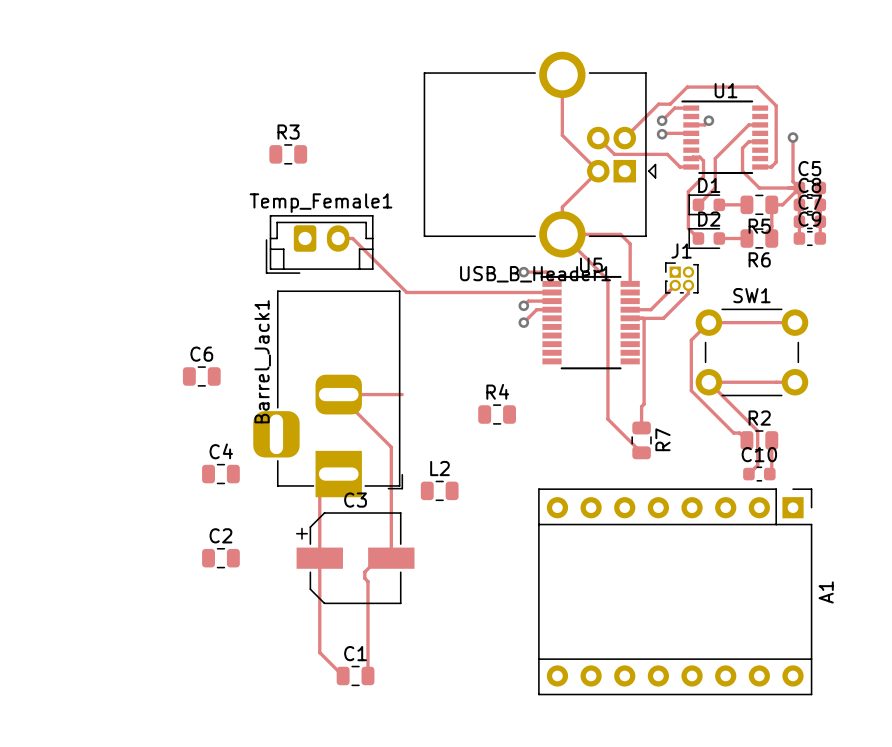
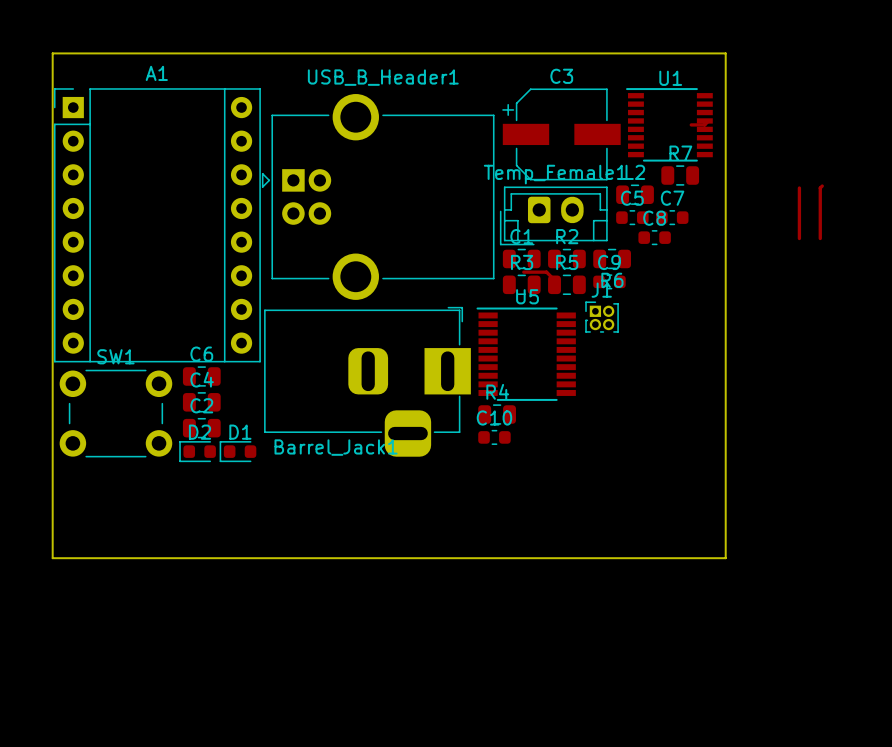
board edge: none -> (52, 53) (725, 53) (725, 558) (52, 558) (52, 53)
track: (562, 74) (562, 135) (598, 171) (562, 207) (562, 234) -> none
track: (691, 108) (674, 108) (662, 120) -> none
via: (662, 120) -> none
via: (708, 120) -> none
track: (760, 124) (748, 124) (715, 158) (715, 188) (698, 204) -> none
track: (691, 133) (662, 134) -> none
via: (662, 134) -> none
U1 position: (724, 137) -> (669, 124)
track: (793, 137) (793, 181) (799, 188) -> none
via: (793, 137) -> none
track: (598, 138) (614, 154) (667, 154) (680, 166) (691, 166) -> none
track: (624, 138) (658, 104) (670, 104) (687, 87) (757, 87) (776, 105) (776, 162) (771, 166) (760, 166) -> none
track: (760, 141) (748, 141) (742, 148) (742, 171) (759, 188) (799, 188) -> none
R3 position: (288, 154) -> (521, 284)
USB_B_Header1 rotation: 0° (539, 154) -> 180° (378, 196)
USB_B_Header1 position: (539, 154) -> (378, 196)
track: (691, 158) (699, 157) (703, 160) (703, 176) (688, 191) (688, 228) (698, 238) -> none
track: (799, 188) (782, 204) (771, 204) (771, 238) -> none
C5 position: (809, 188) -> (632, 217)
D1 position: (706, 204) -> (237, 451)
track: (719, 204) (746, 204) -> none
R5 position: (759, 204) -> (566, 284)
C8 position: (809, 204) -> (654, 237)
C7 position: (809, 221) -> (672, 217)
R5 name position: R5 (759, 226) -> R5 (567, 262)
track: (562, 234) (607, 279) (607, 419) (641, 452) -> none
track: (562, 234) (620, 234) (630, 243) (630, 283) -> none
track: (338, 238) (352, 238) (406, 292) (552, 292) -> none
D2 position: (706, 238) -> (197, 451)
track: (719, 238) (746, 238) -> none
R6 position: (759, 238) -> (612, 258)
C9 position: (809, 238) -> (609, 281)
Temp_Female1 position: (319, 244) -> (553, 215)
via: (523, 272) -> none
J1 position: (681, 277) -> (602, 317)
track: (675, 285) (650, 309) (630, 309) -> none
track: (688, 285) (688, 293) (663, 318) (630, 318) -> none
track: (552, 301) (528, 301) (523, 305) -> none
via: (523, 305) -> none
track: (552, 309) (536, 309) (523, 322) -> none
track: (643, 318) (644, 404) (641, 406) (641, 427) -> none
via: (523, 322) -> none
U5 position: (590, 322) -> (526, 354)
track: (795, 322) (708, 322) (691, 340) (691, 390) (733, 433) (739, 433) (746, 440) -> none
SW1 position: (751, 352) -> (115, 413)
track: (795, 382) (708, 382) (757, 431) (757, 465) (748, 474) -> none
Barrel_Jack1 rotation: 0° (328, 393) -> 90° counterclockwise (367, 381)
track: (402, 394) (338, 394) (391, 447) (391, 558) (378, 558) (364, 572) (364, 578) (367, 581) (367, 675) -> none
R7 name position: R7 (662, 439) -> R7 (680, 153)
R7 rotation: 0° (641, 440) -> 90° clockwise (680, 175)
R7 position: (641, 440) -> (680, 175)
R2 position: (759, 440) -> (566, 258)
track: (771, 440) (771, 472) (769, 474) -> none
C4 position: (220, 474) -> (201, 402)
track: (338, 474) (319, 493) (319, 652) (343, 675) -> none
C10 position: (759, 474) -> (494, 437)
L2 position: (439, 490) -> (635, 194)
C3 footprint: [295, 512, 415, 605] -> [502, 88, 621, 181]
C2 position: (220, 558) -> (201, 428)
A1 rotation: 0° (675, 591) -> 90° counterclockwise (157, 225)
A1 position: (675, 591) -> (157, 225)
C1 position: (355, 675) -> (521, 258)

